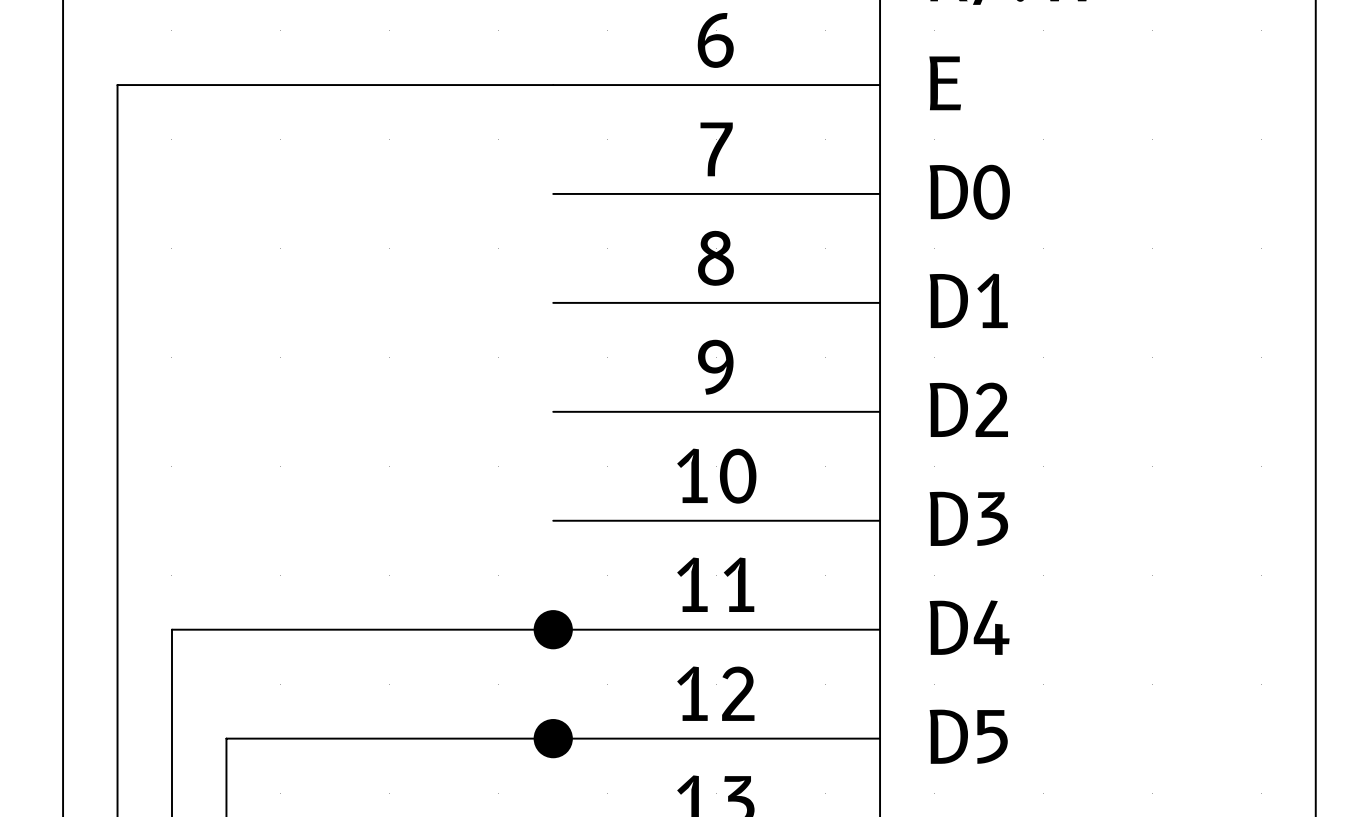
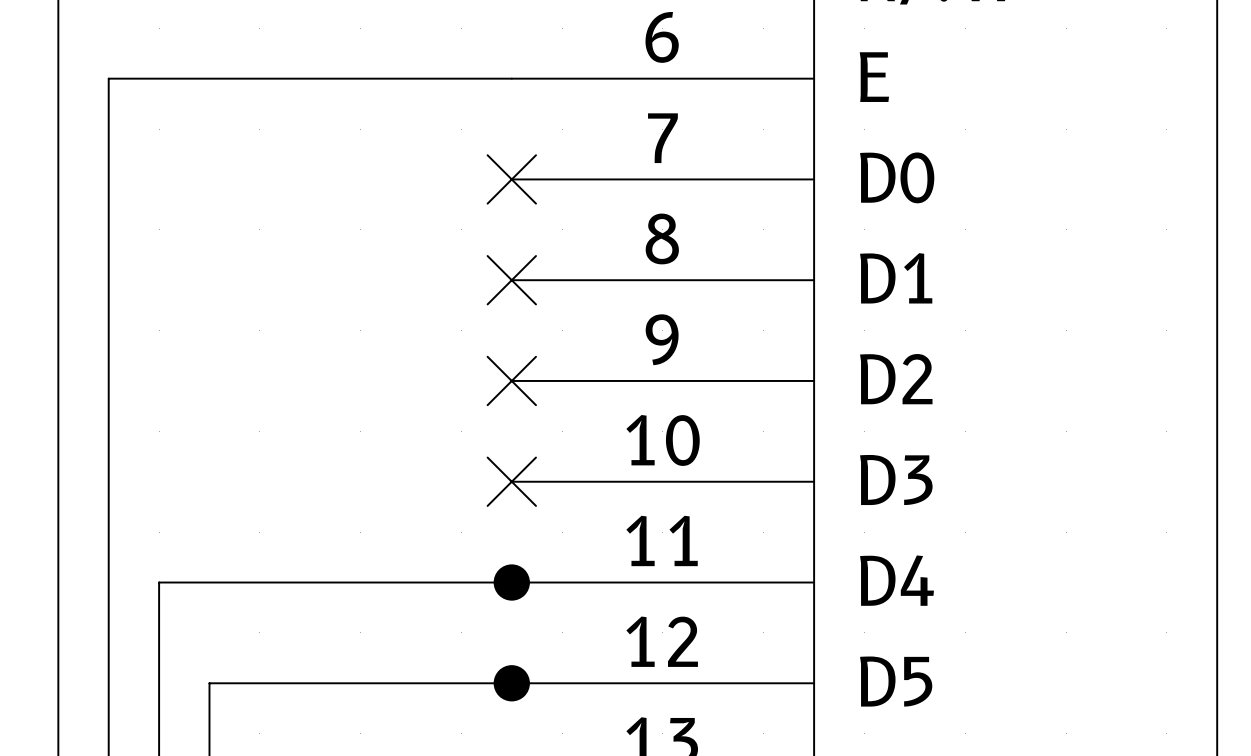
no-connect mark: none -> (511, 179)
no-connect mark: none -> (511, 280)
no-connect mark: none -> (511, 380)
no-connect mark: none -> (511, 481)

